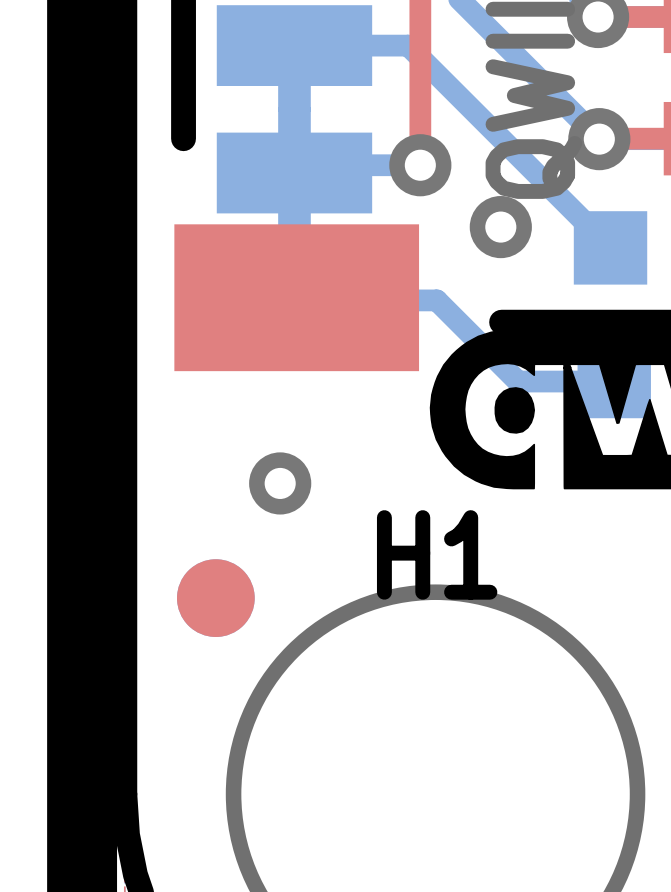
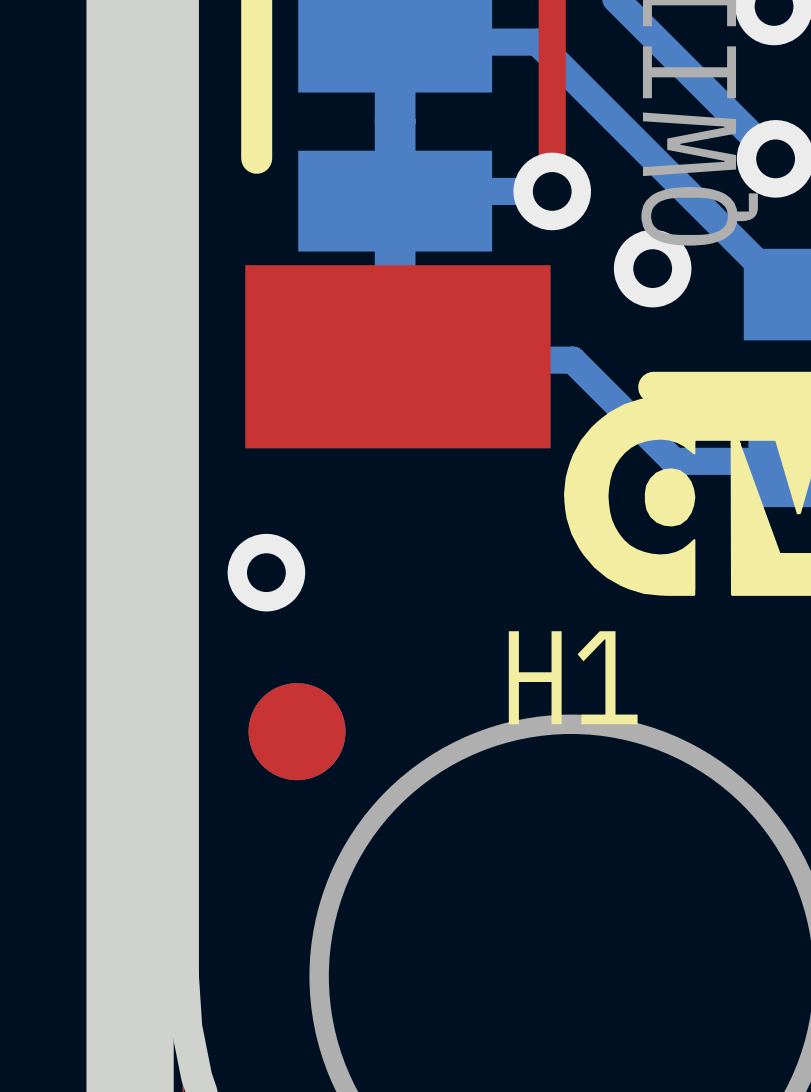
via position: (280, 483) -> (266, 572)

